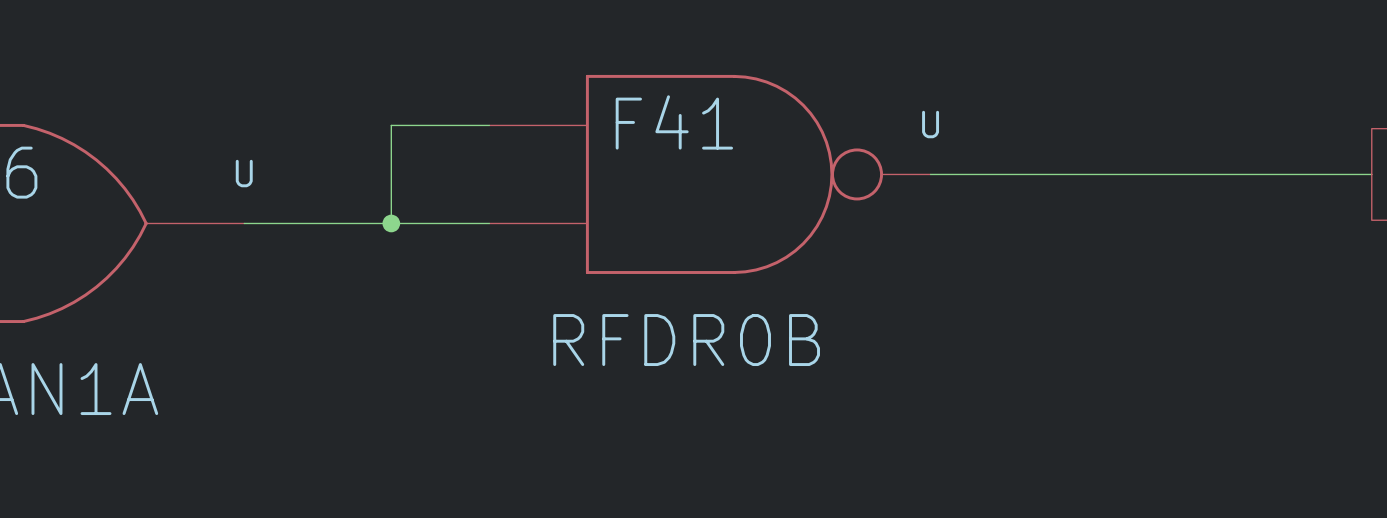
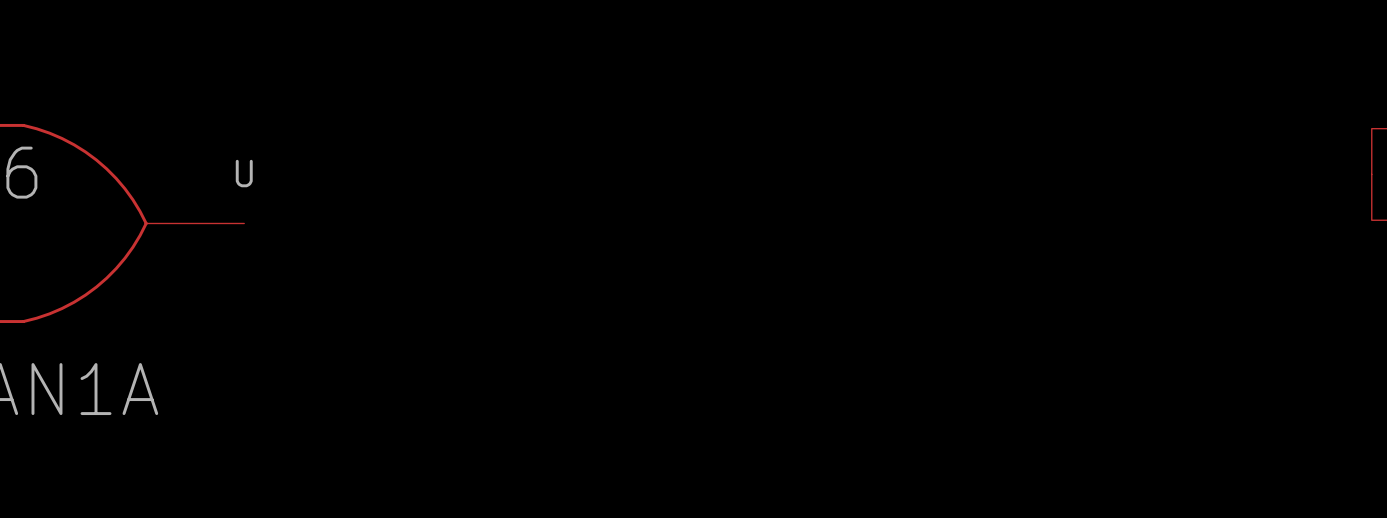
wire: (489, 125) (391, 125) (391, 223) -> none
U: (709, 174) -> none
wire: (930, 174) (1371, 174) -> none
wire: (244, 223) (489, 223) -> none
junction: (391, 223) -> none

